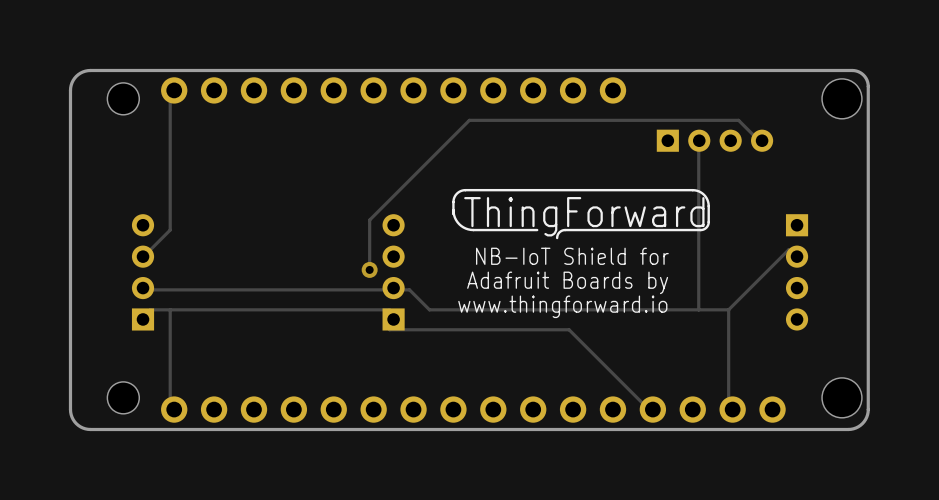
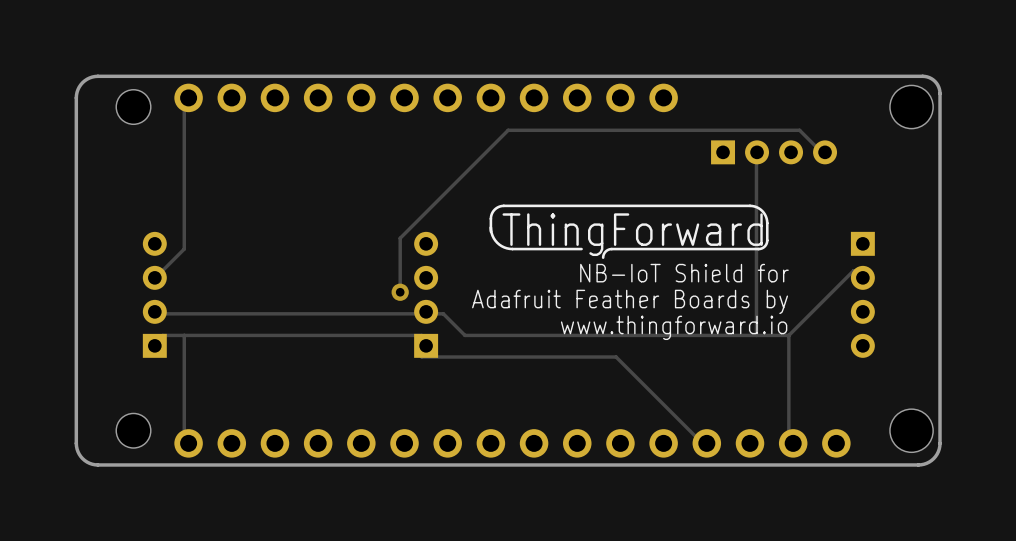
text position: NB-IoT Shield for (572, 256) -> NB-IoT Shield for (684, 273)
text: Adafruit Boards by (567, 282) -> Adafruit Feather Boards by (630, 301)
text position: www.thingforward.io (562, 306) -> www.thingforward.io (674, 327)

